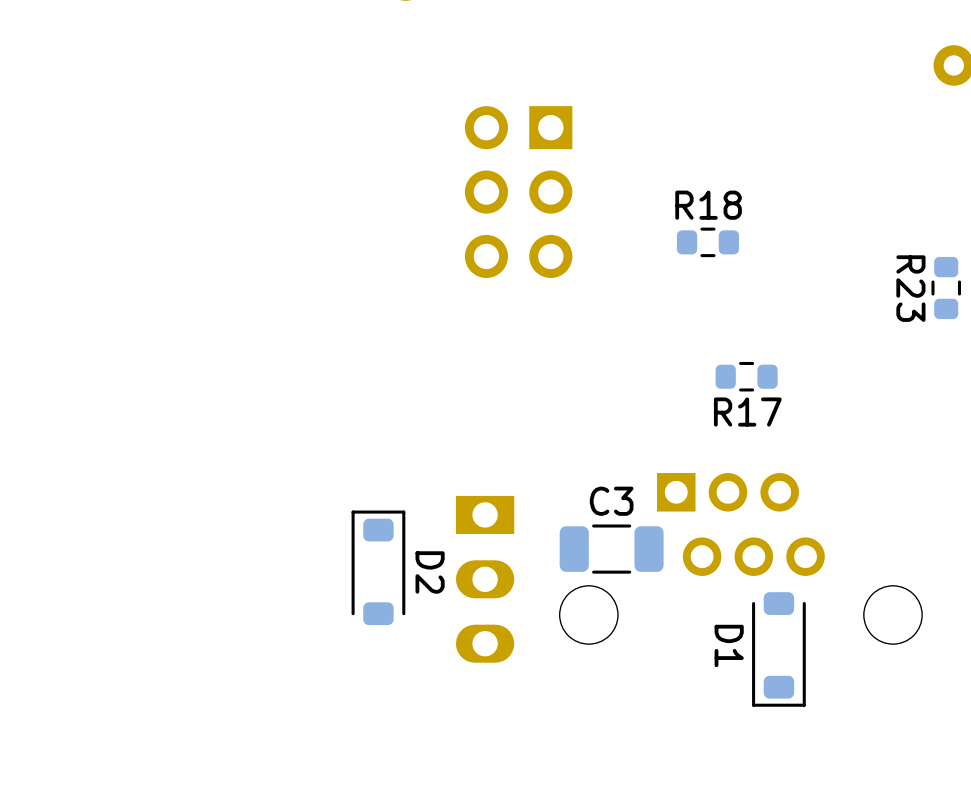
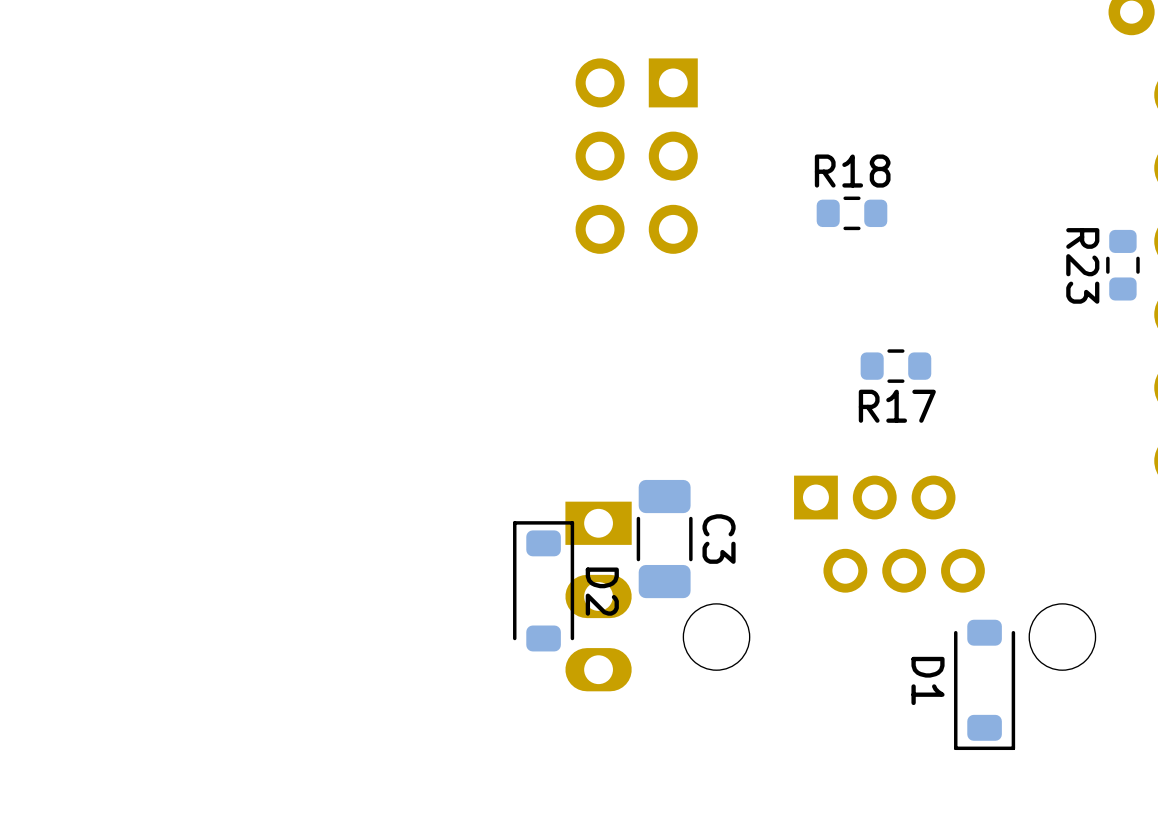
C3 rotation: 0° (611, 549) -> 90° clockwise (664, 539)
C3 position: (611, 549) -> (664, 539)
D2 position: (378, 567) -> (543, 586)
D1 position: (778, 649) -> (984, 684)

